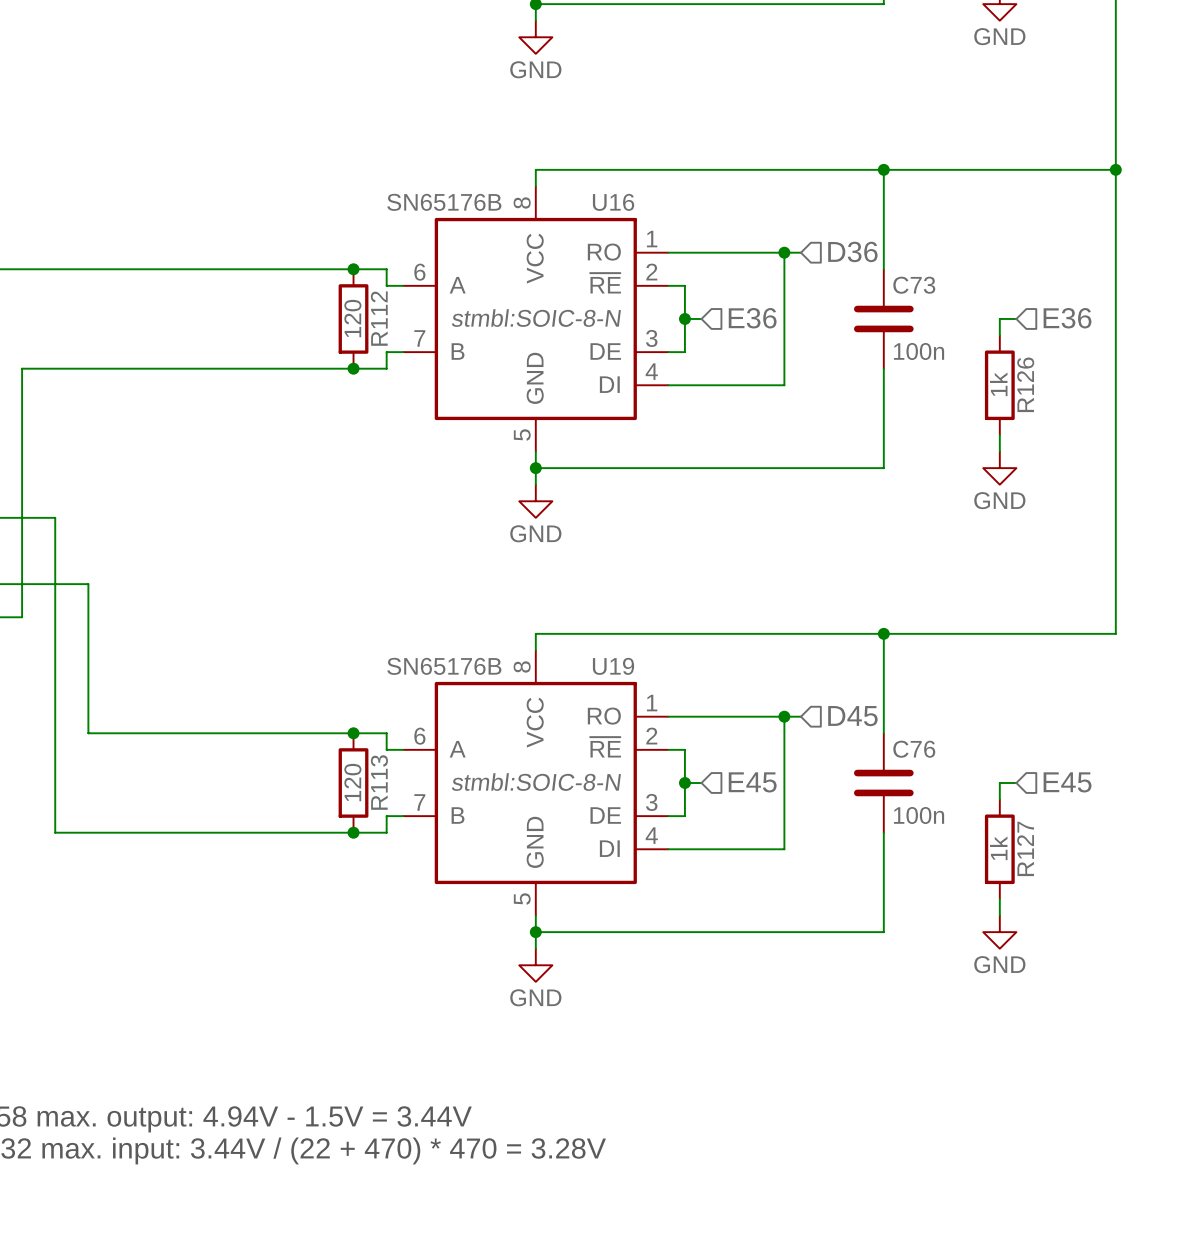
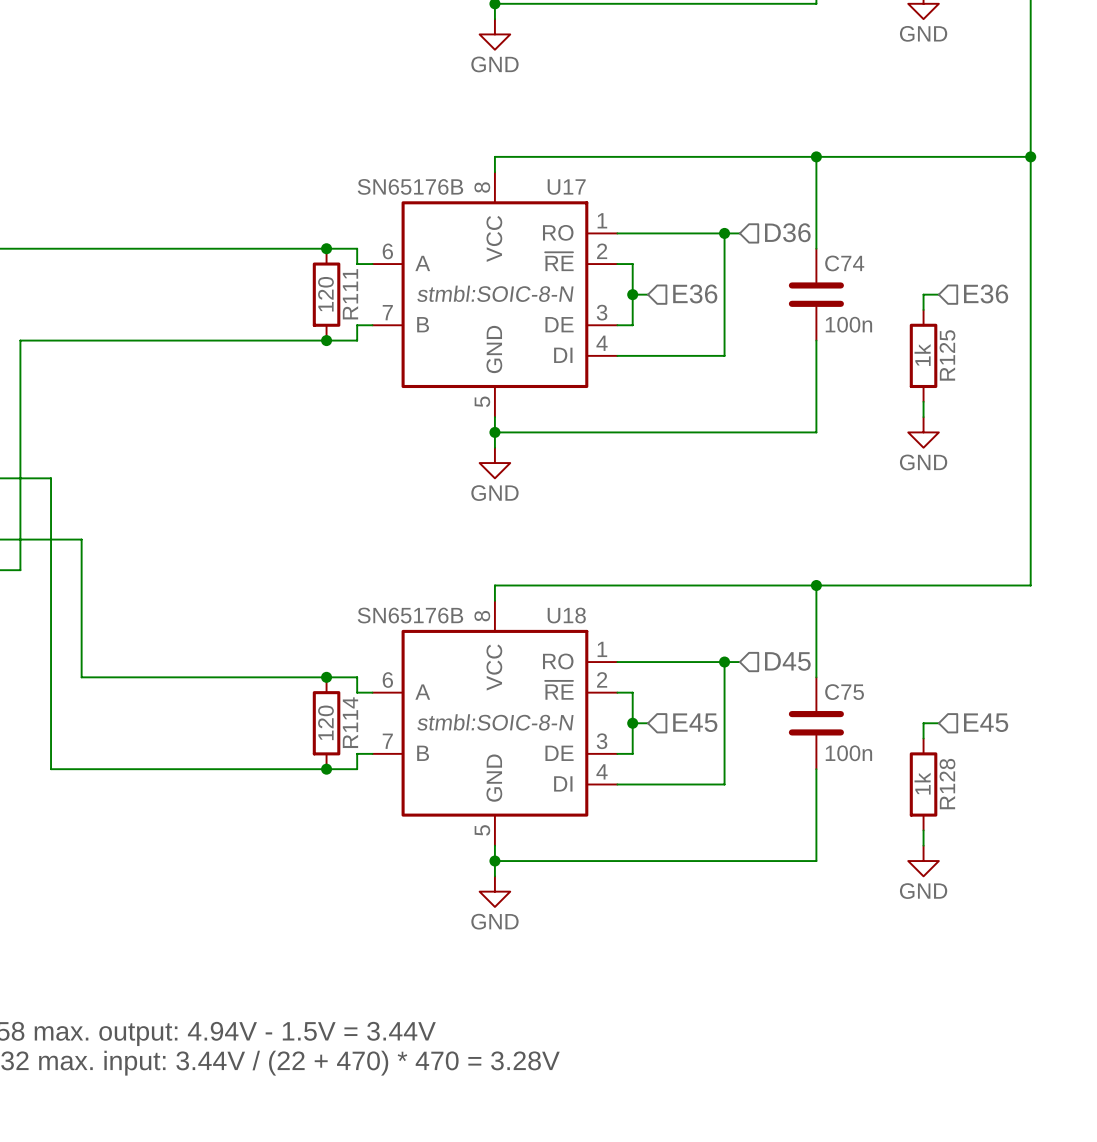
U16 name: U16 (613, 202) -> U17 (566, 187)
C73 name: C73 (914, 285) -> C74 (844, 263)
R112 name: R112 (379, 318) -> R111 (350, 294)
R126 name: R126 (1025, 384) -> R125 (947, 355)
U19 name: U19 (613, 666) -> U18 (566, 615)
C76 name: C76 (914, 749) -> C75 (844, 692)
R113 name: R113 (379, 782) -> R114 (350, 722)
R127 name: R127 (1025, 848) -> R128 (947, 784)

